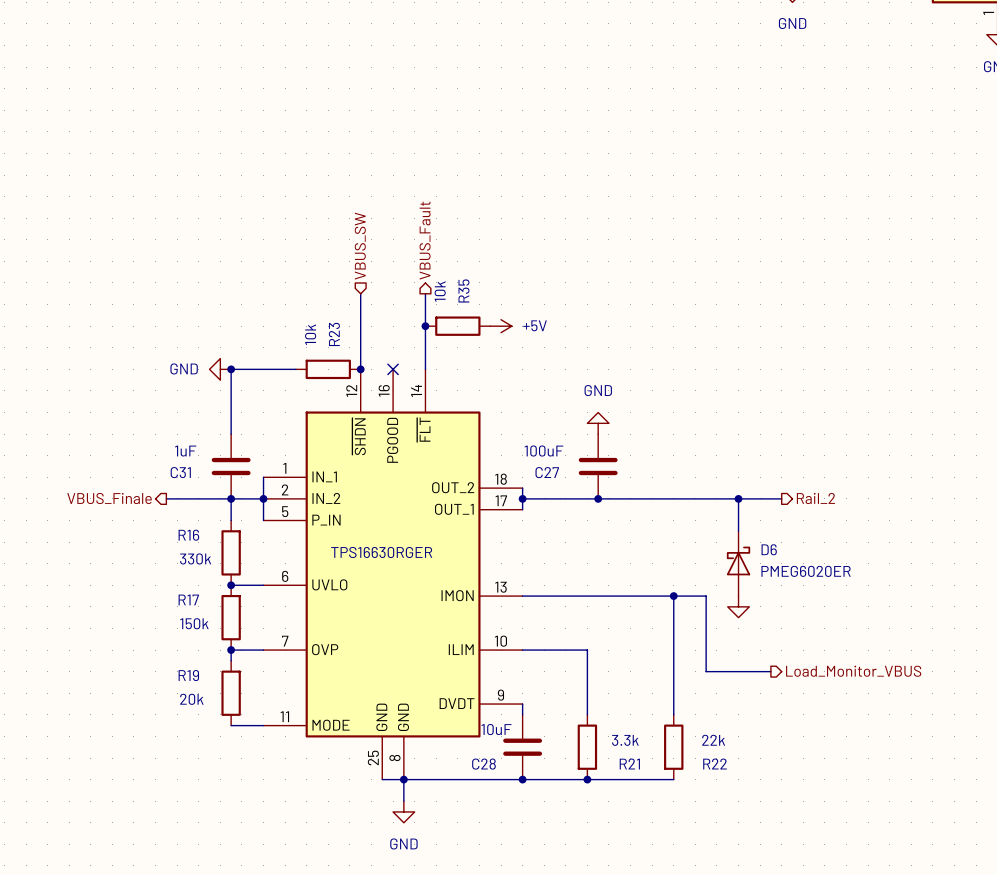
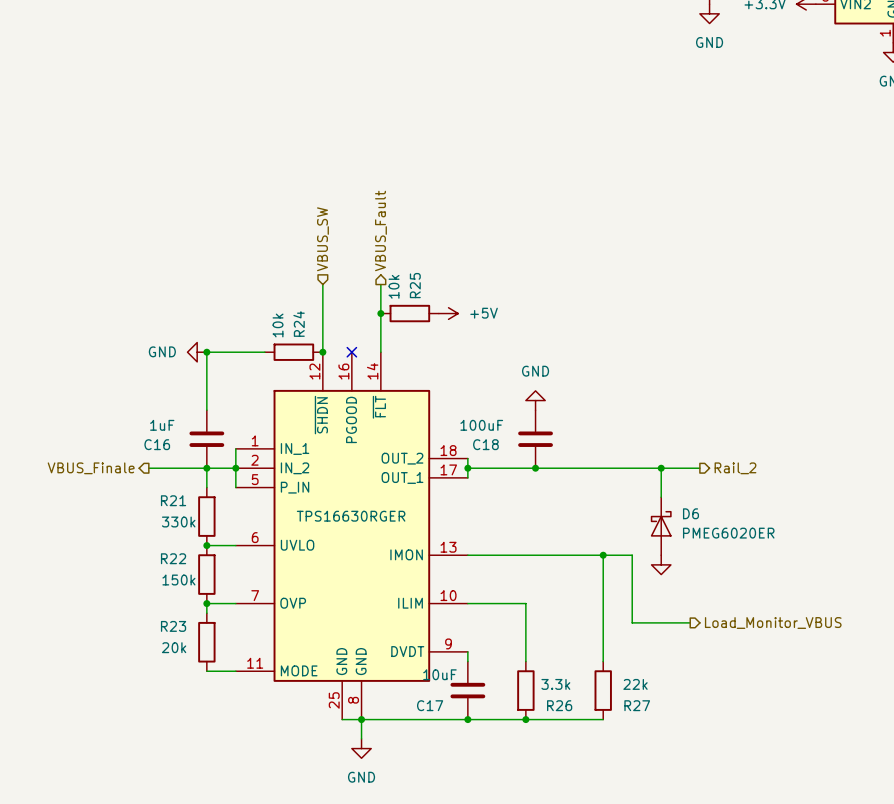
R35 name: R35 (463, 290) -> R25 (415, 285)
R23 name: R23 (334, 334) -> R24 (299, 324)
C31 name: C31 (180, 472) -> C16 (157, 444)
C27 name: C27 (547, 472) -> C18 (485, 444)
R16 name: R16 (188, 535) -> R21 (173, 500)
R17 name: R17 (188, 599) -> R22 (173, 558)
R19 name: R19 (188, 675) -> R23 (173, 626)
C28 name: C28 (483, 764) -> C17 (430, 705)
R21 name: R21 (629, 764) -> R26 (559, 705)
R22 name: R22 (715, 764) -> R27 (637, 705)

